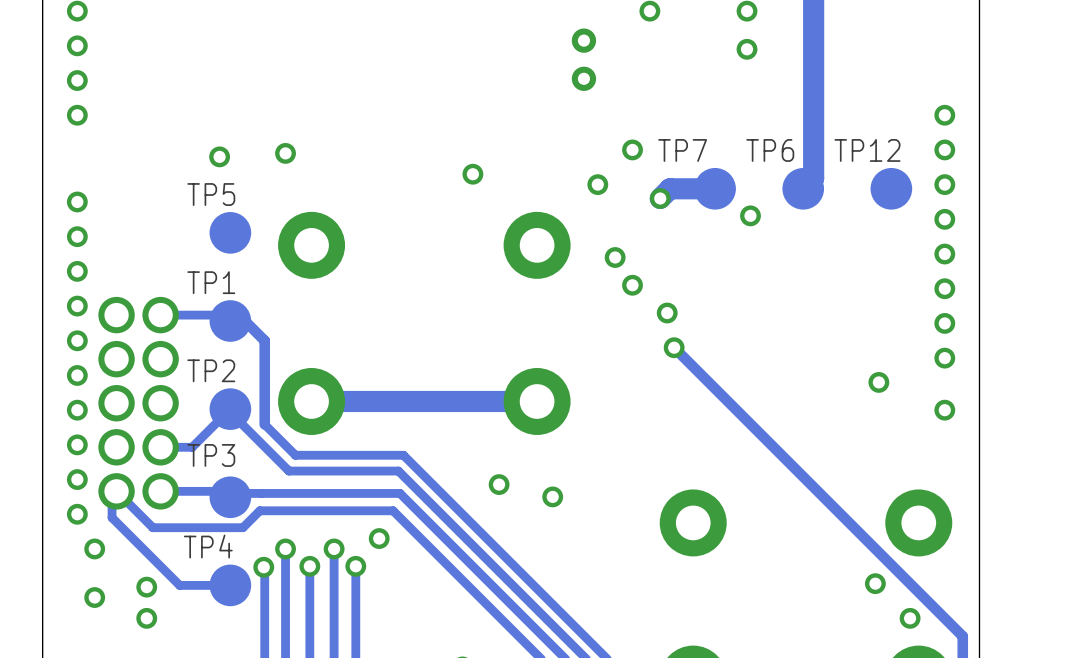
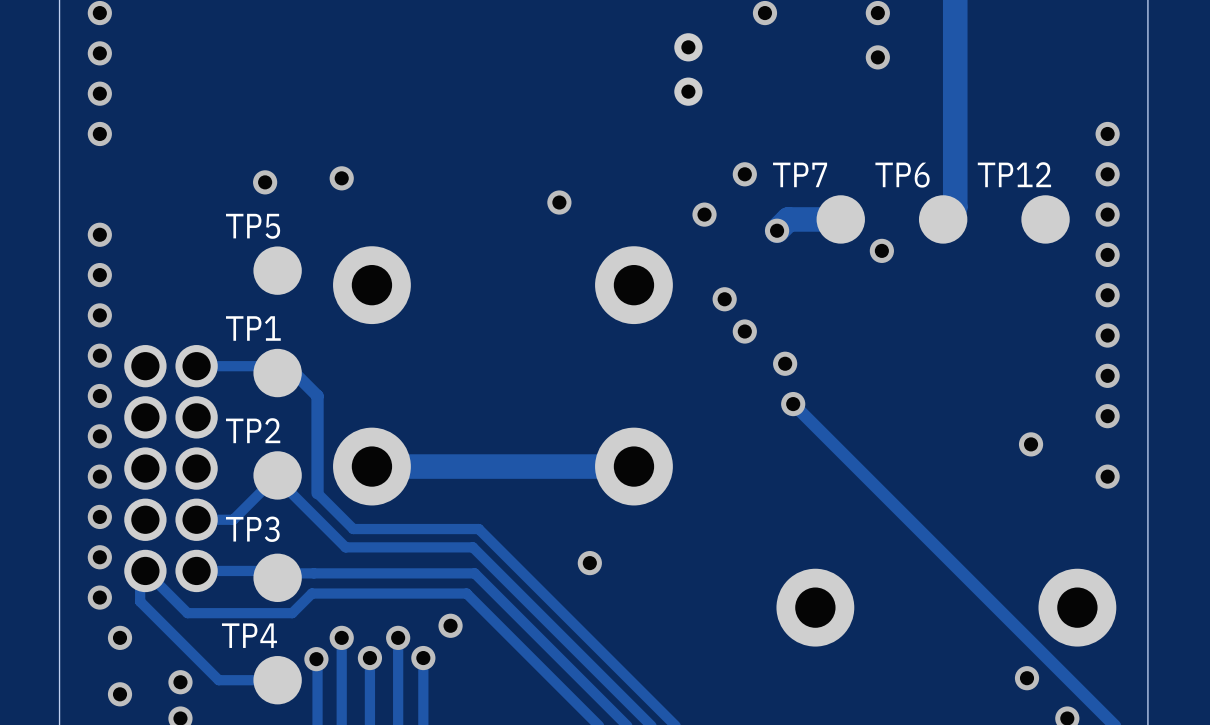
via: (552, 496) -> none

